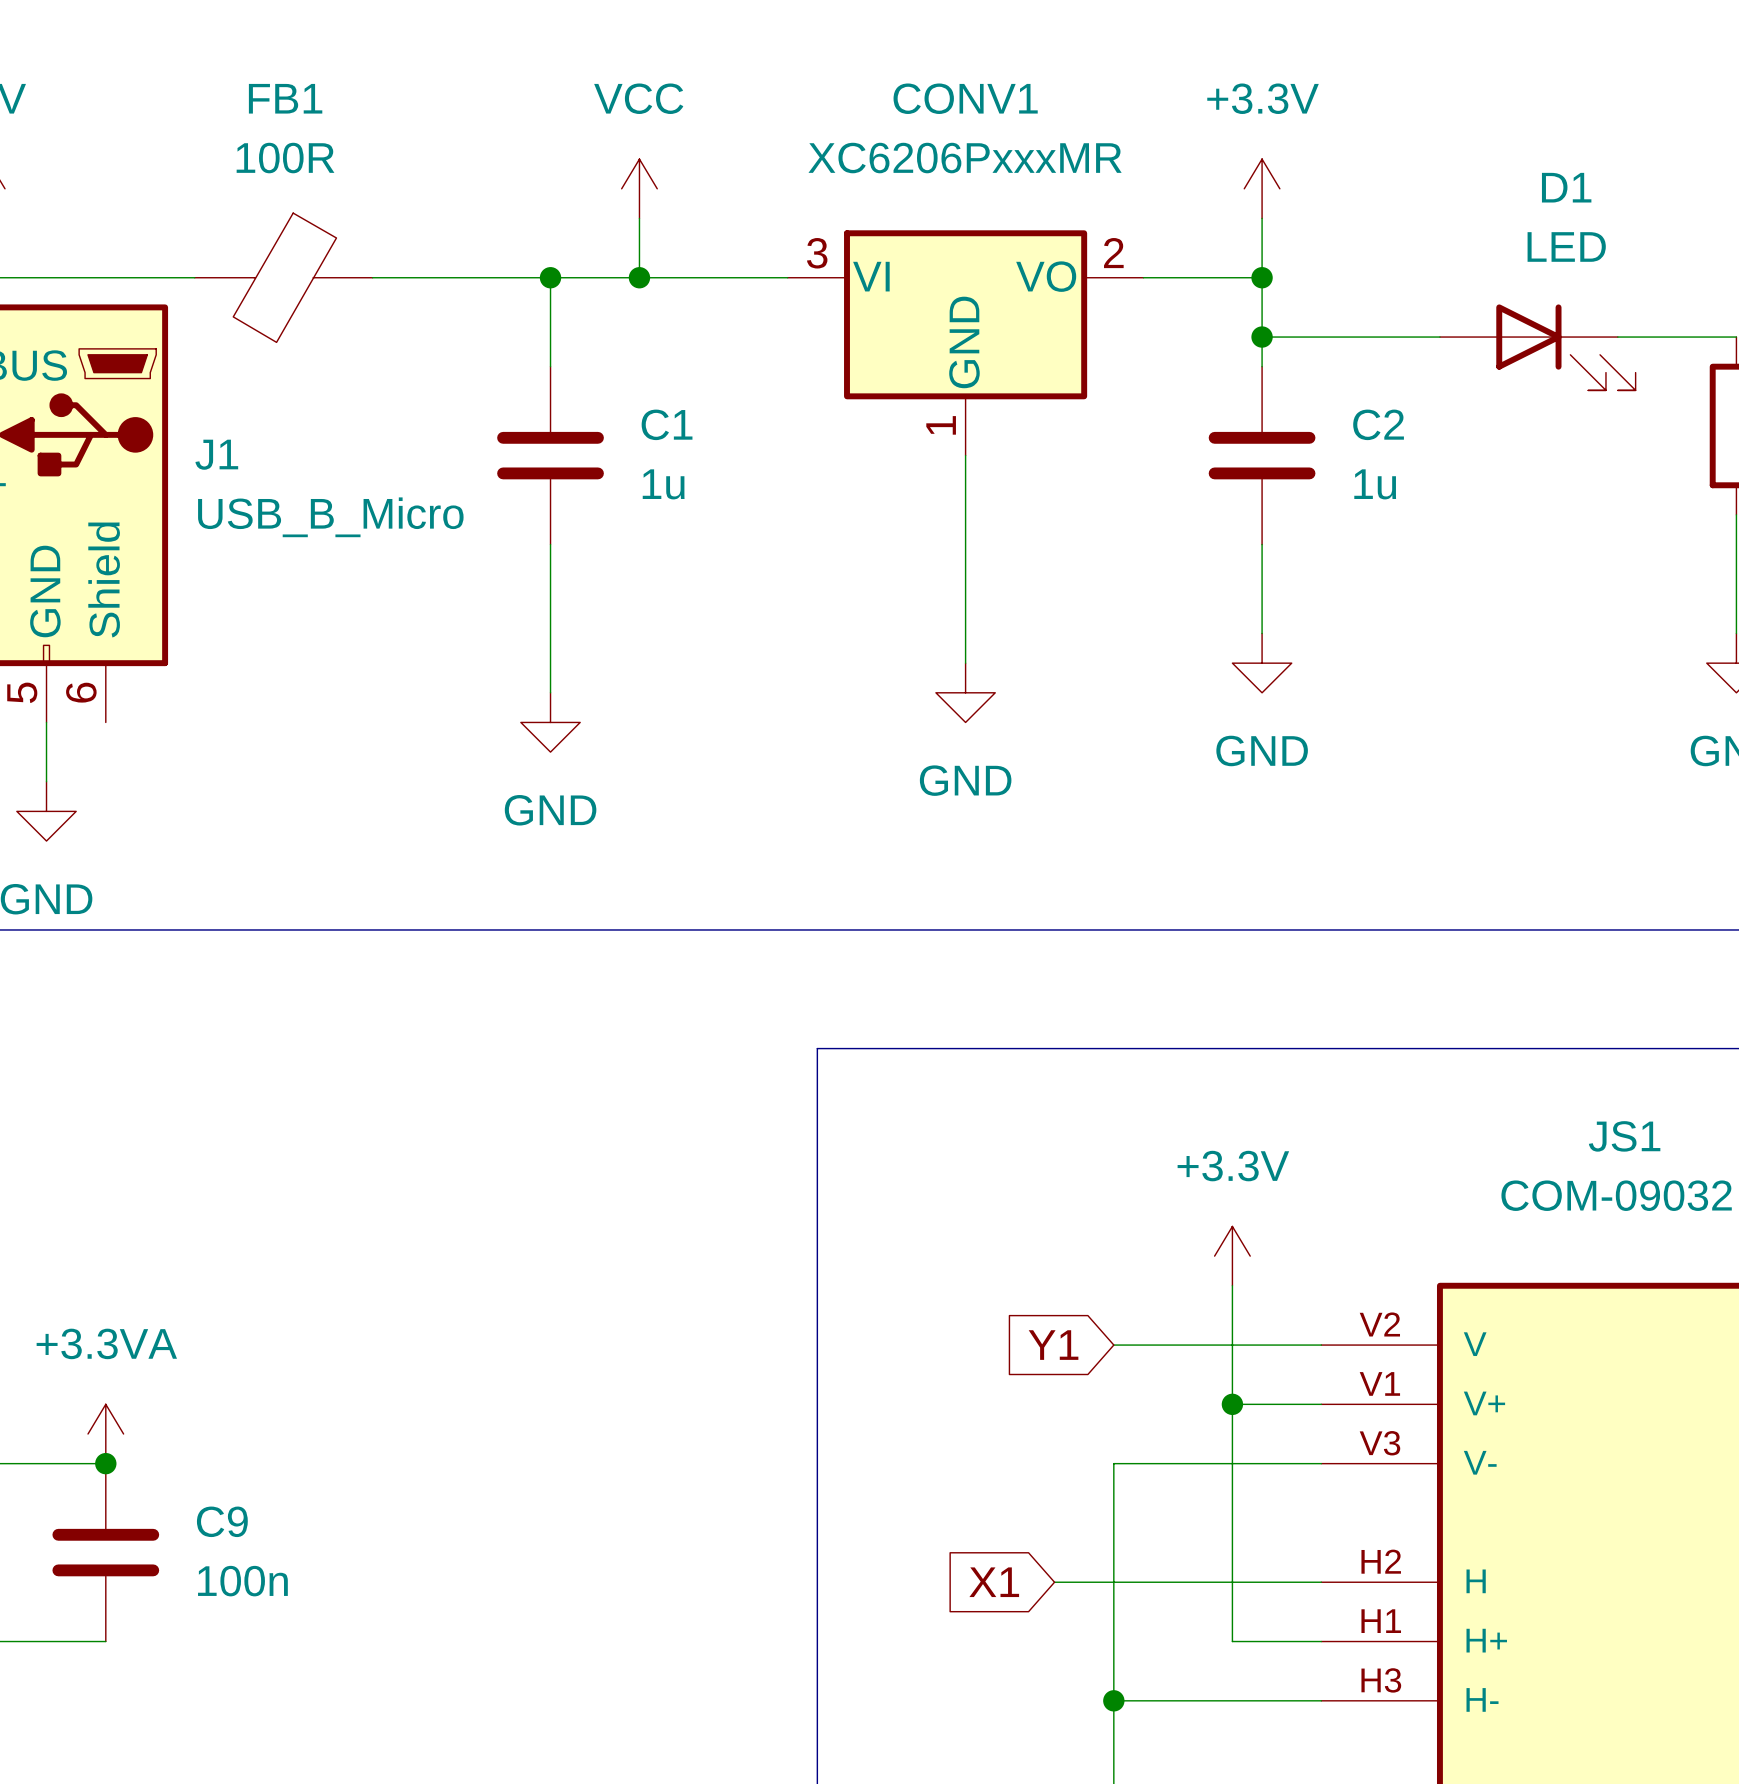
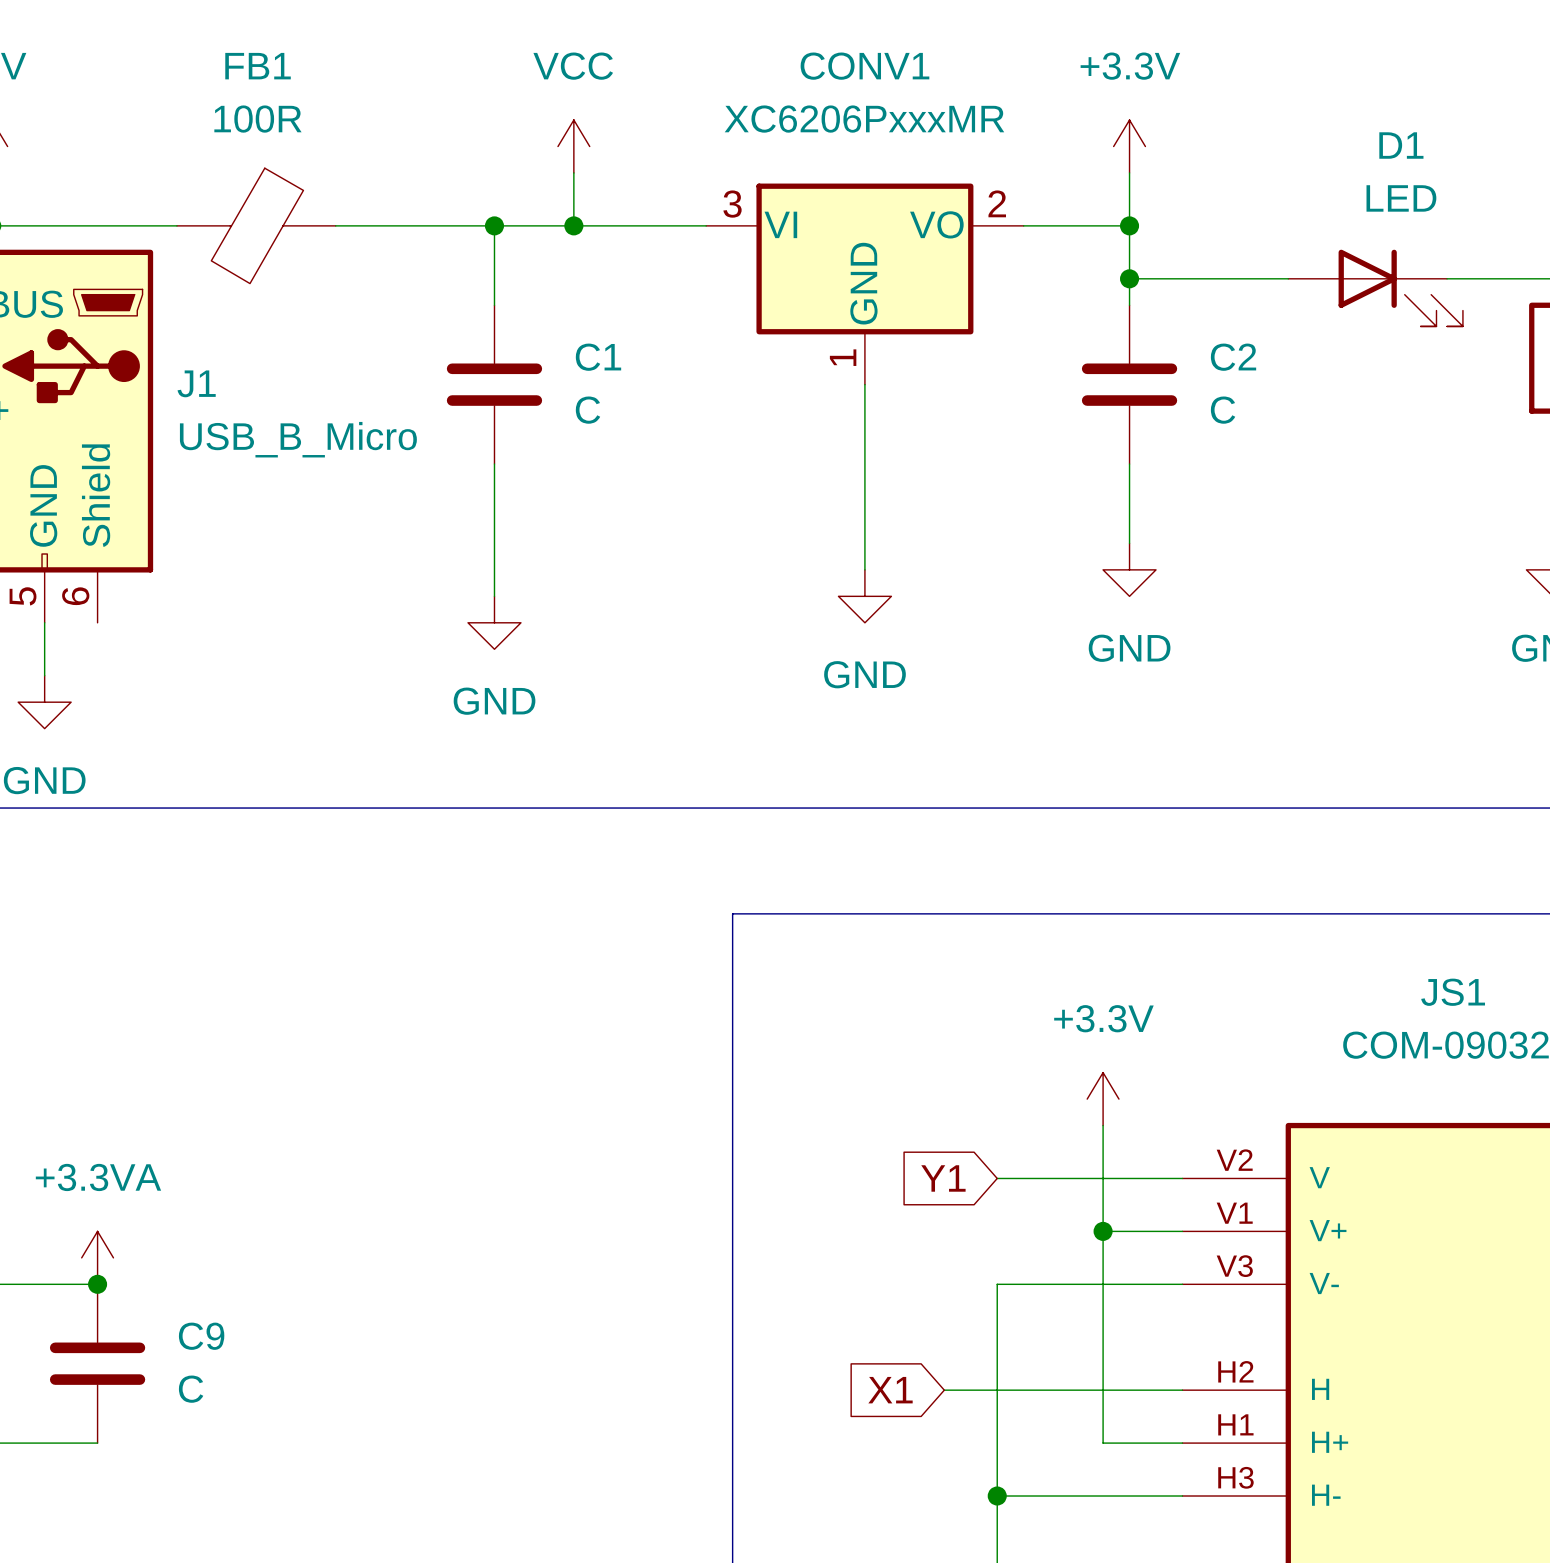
C1 value: 1u (663, 484) -> C (588, 410)
C2 value: 1u (1375, 484) -> C (1223, 410)
C9 value: 100n (242, 1581) -> C (191, 1389)

